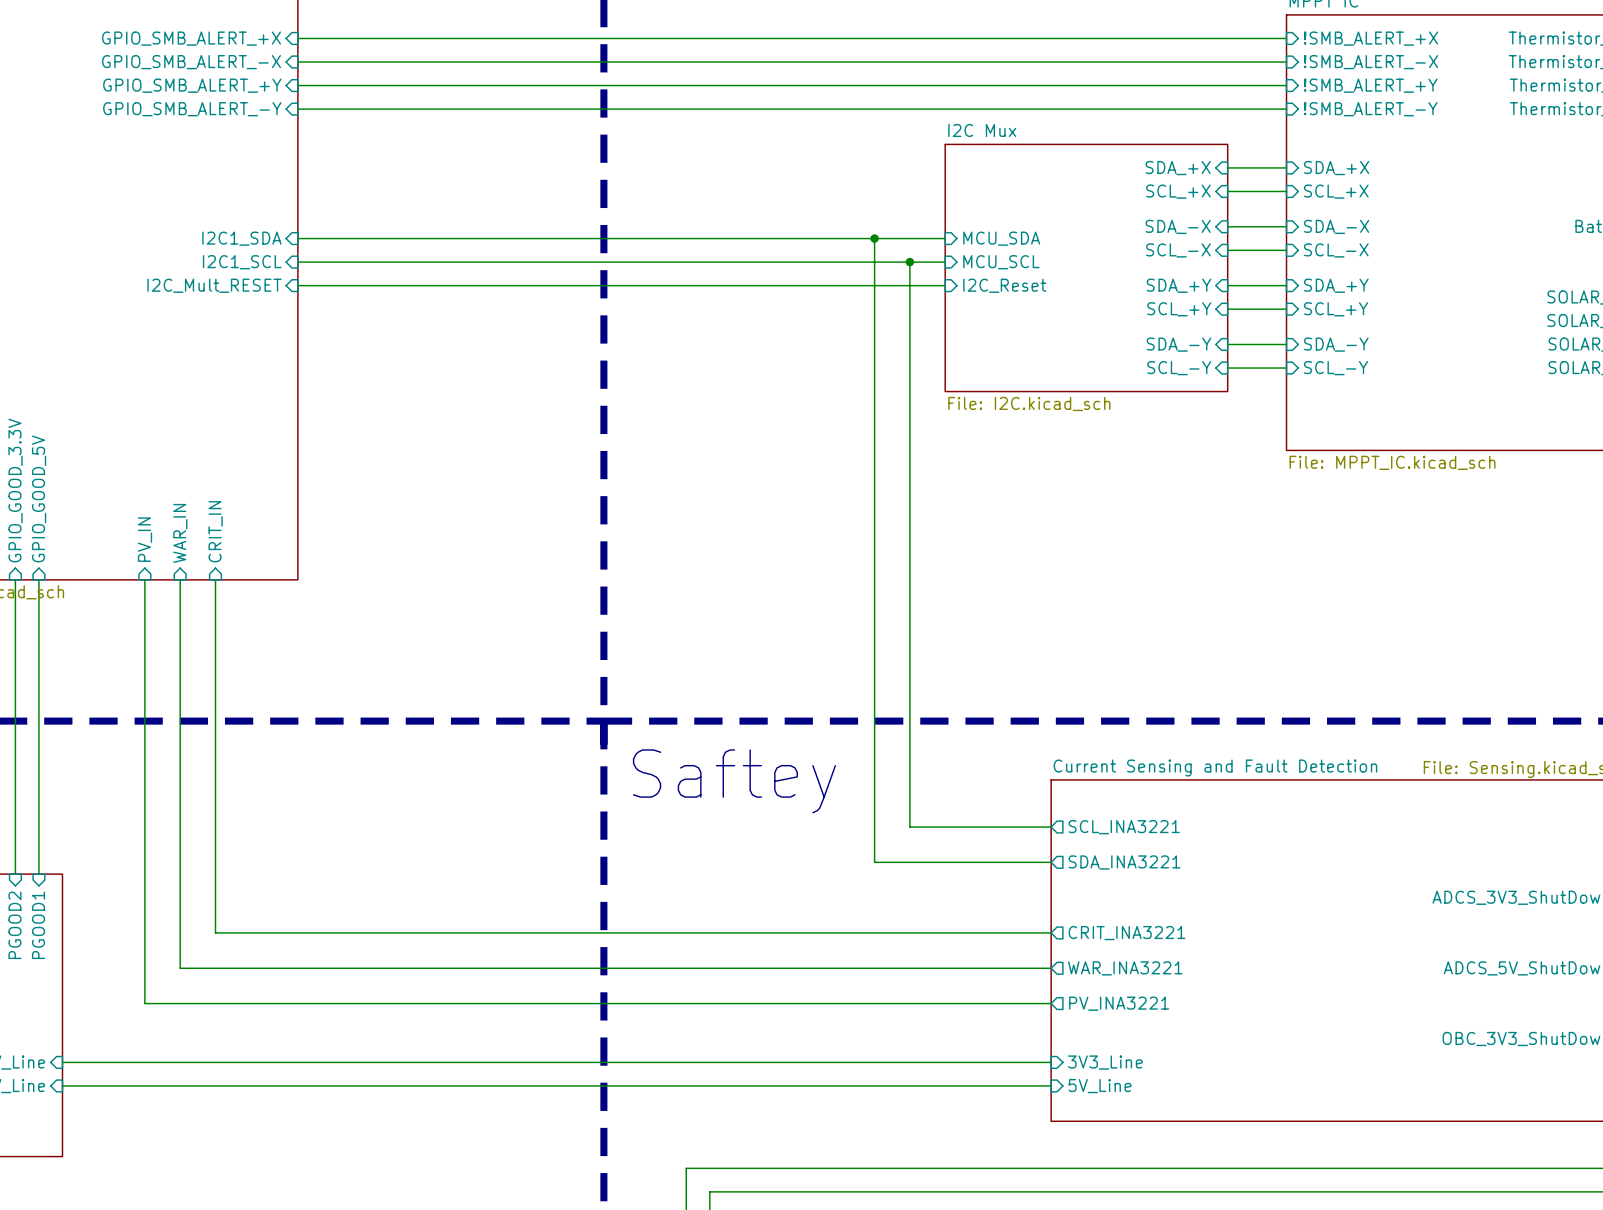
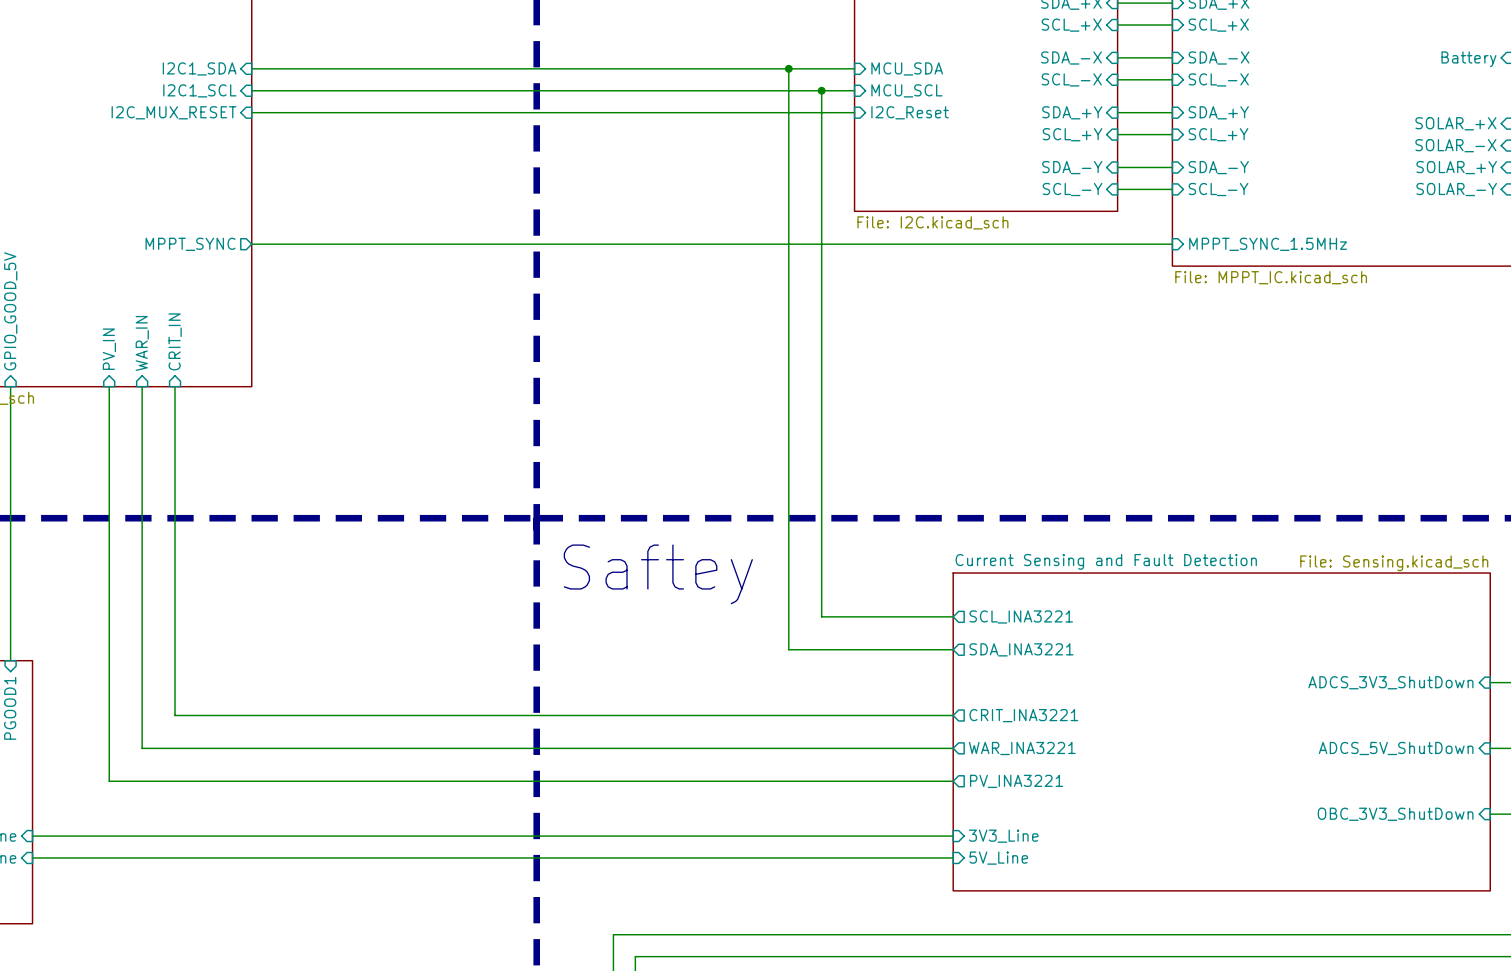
sheet pin: I2C_Mult_RESET (214, 285) -> I2C_MUX_RESET (174, 112)
sheet pin: none -> MPPT_SYNC (190, 244)
wire: none -> (251, 244) (1172, 244)
sheet pin: none -> MPPT_SYNC_1.5MHz (1268, 244)

